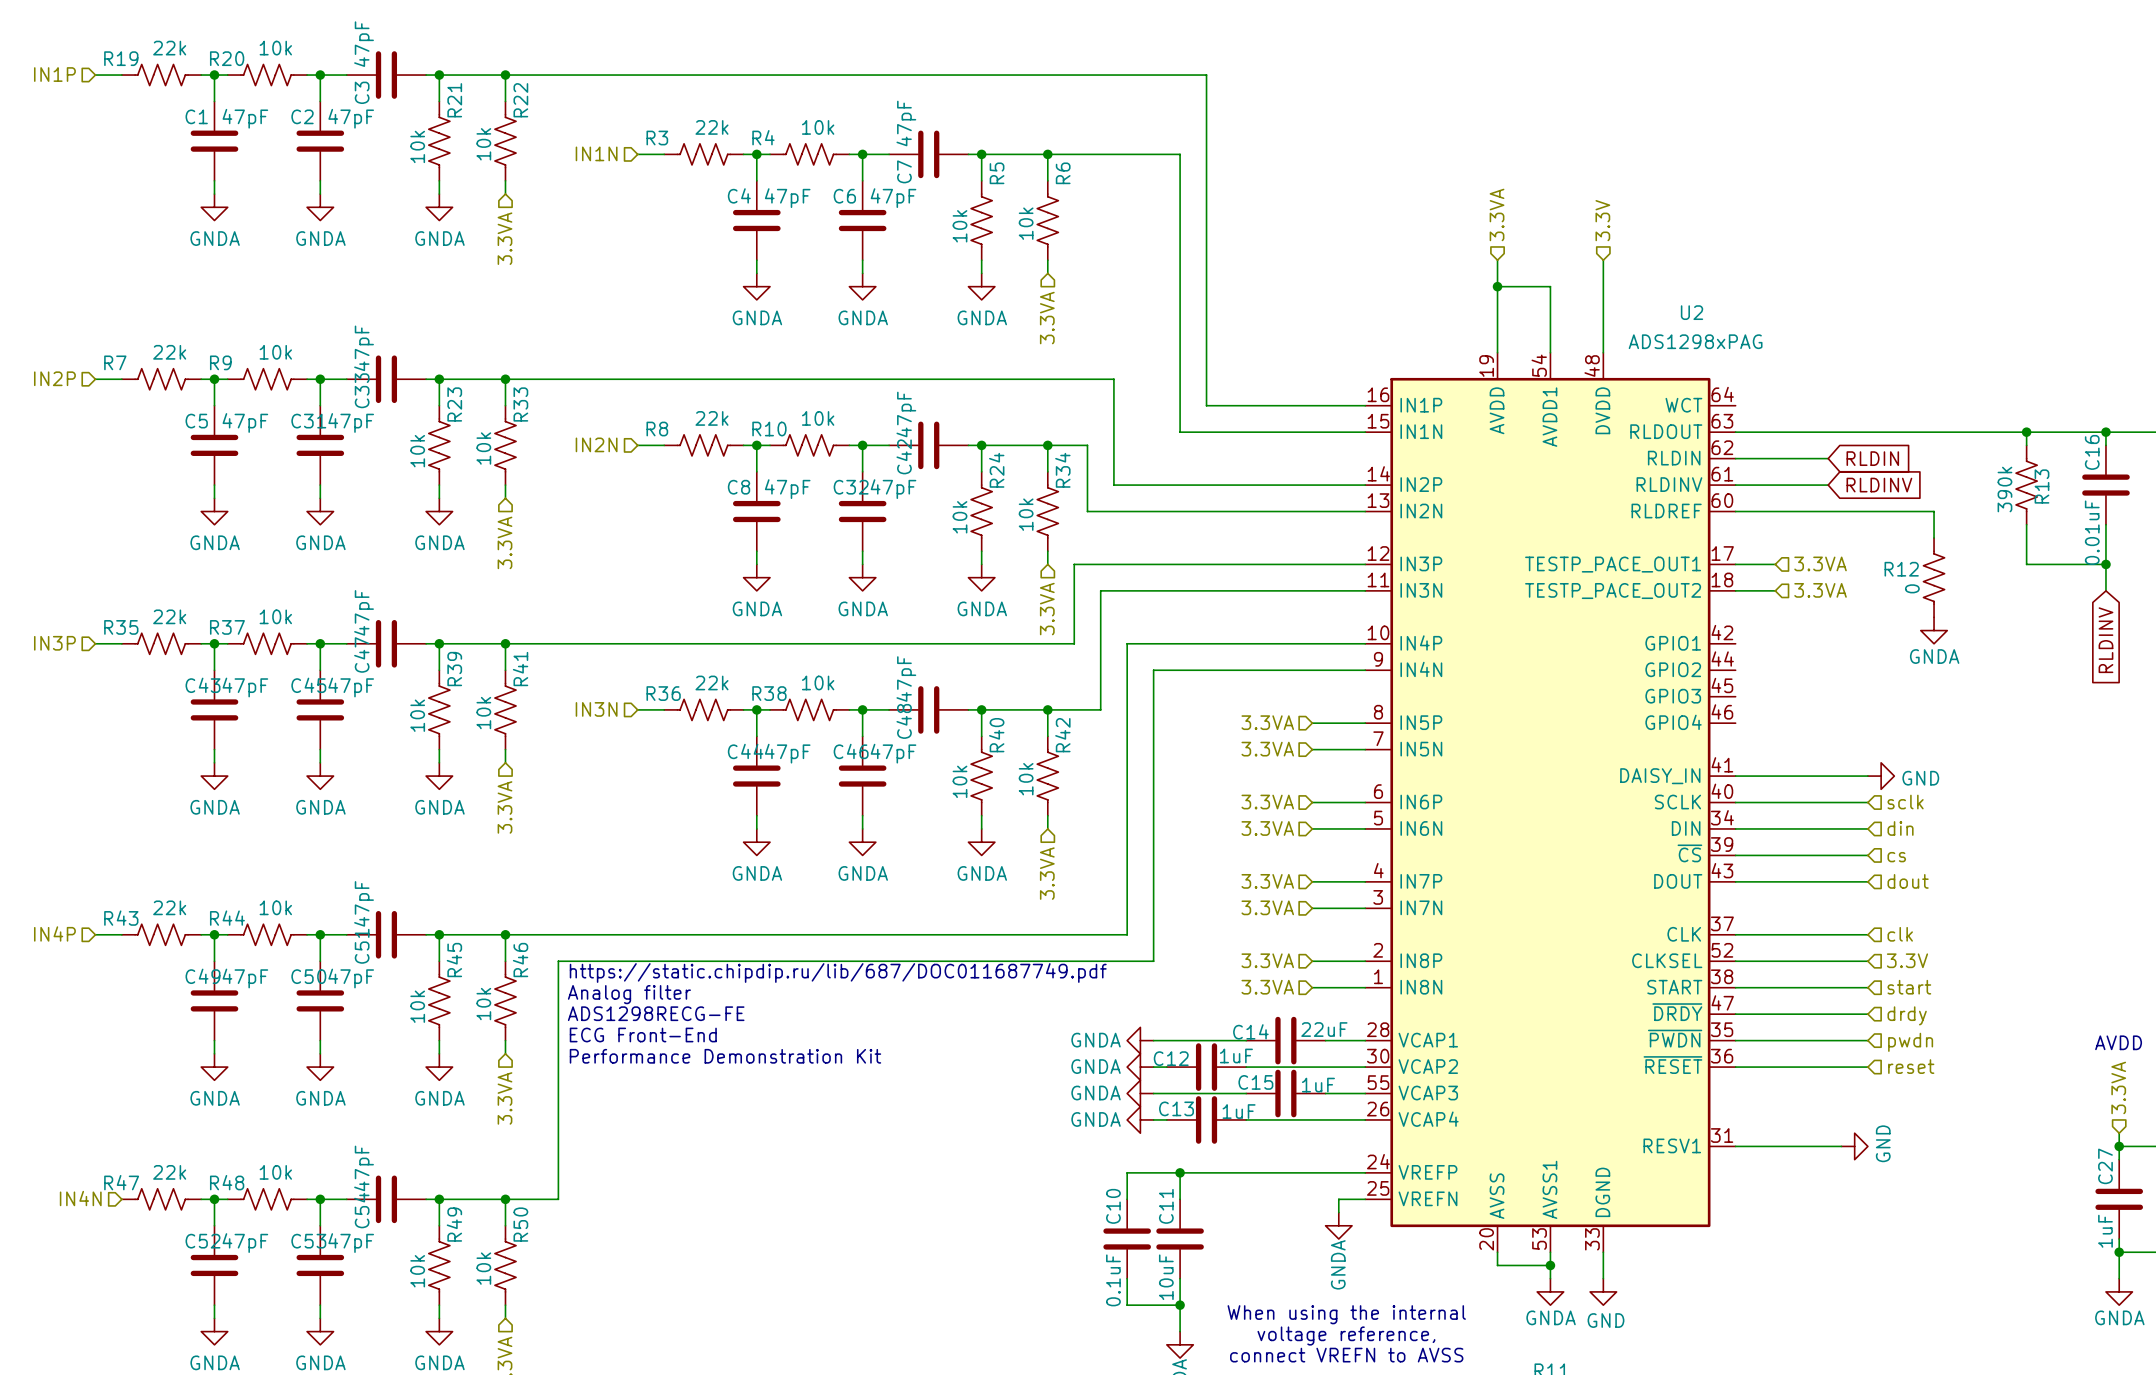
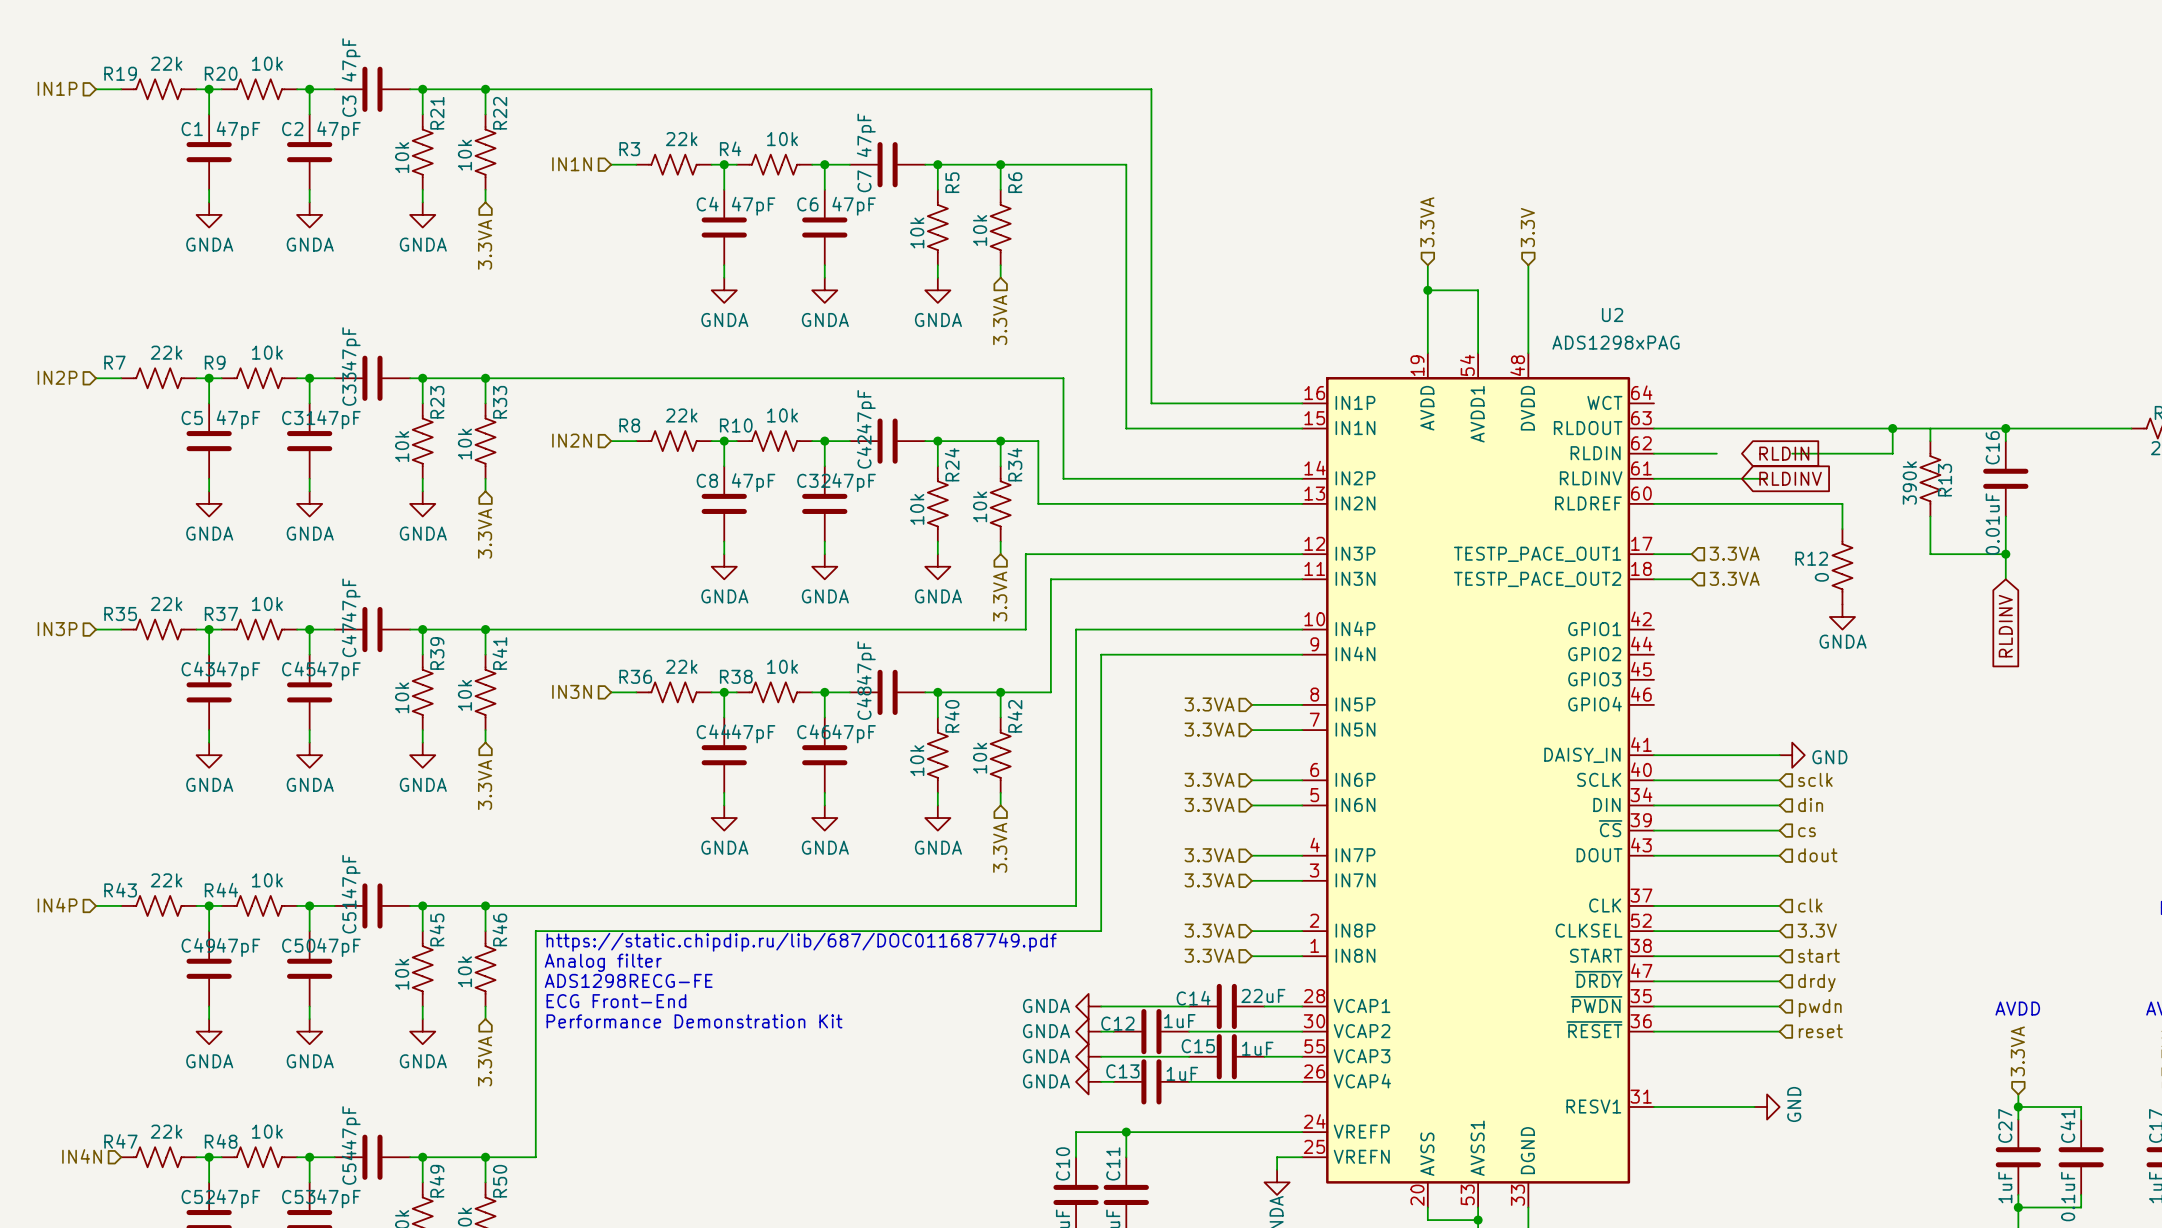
wire: none -> (1892, 428) (1892, 453) (1792, 453)
junction position: (2026, 432) -> (1892, 428)
wire: (1801, 458) (1828, 458) -> (1741, 478) (1767, 478)

